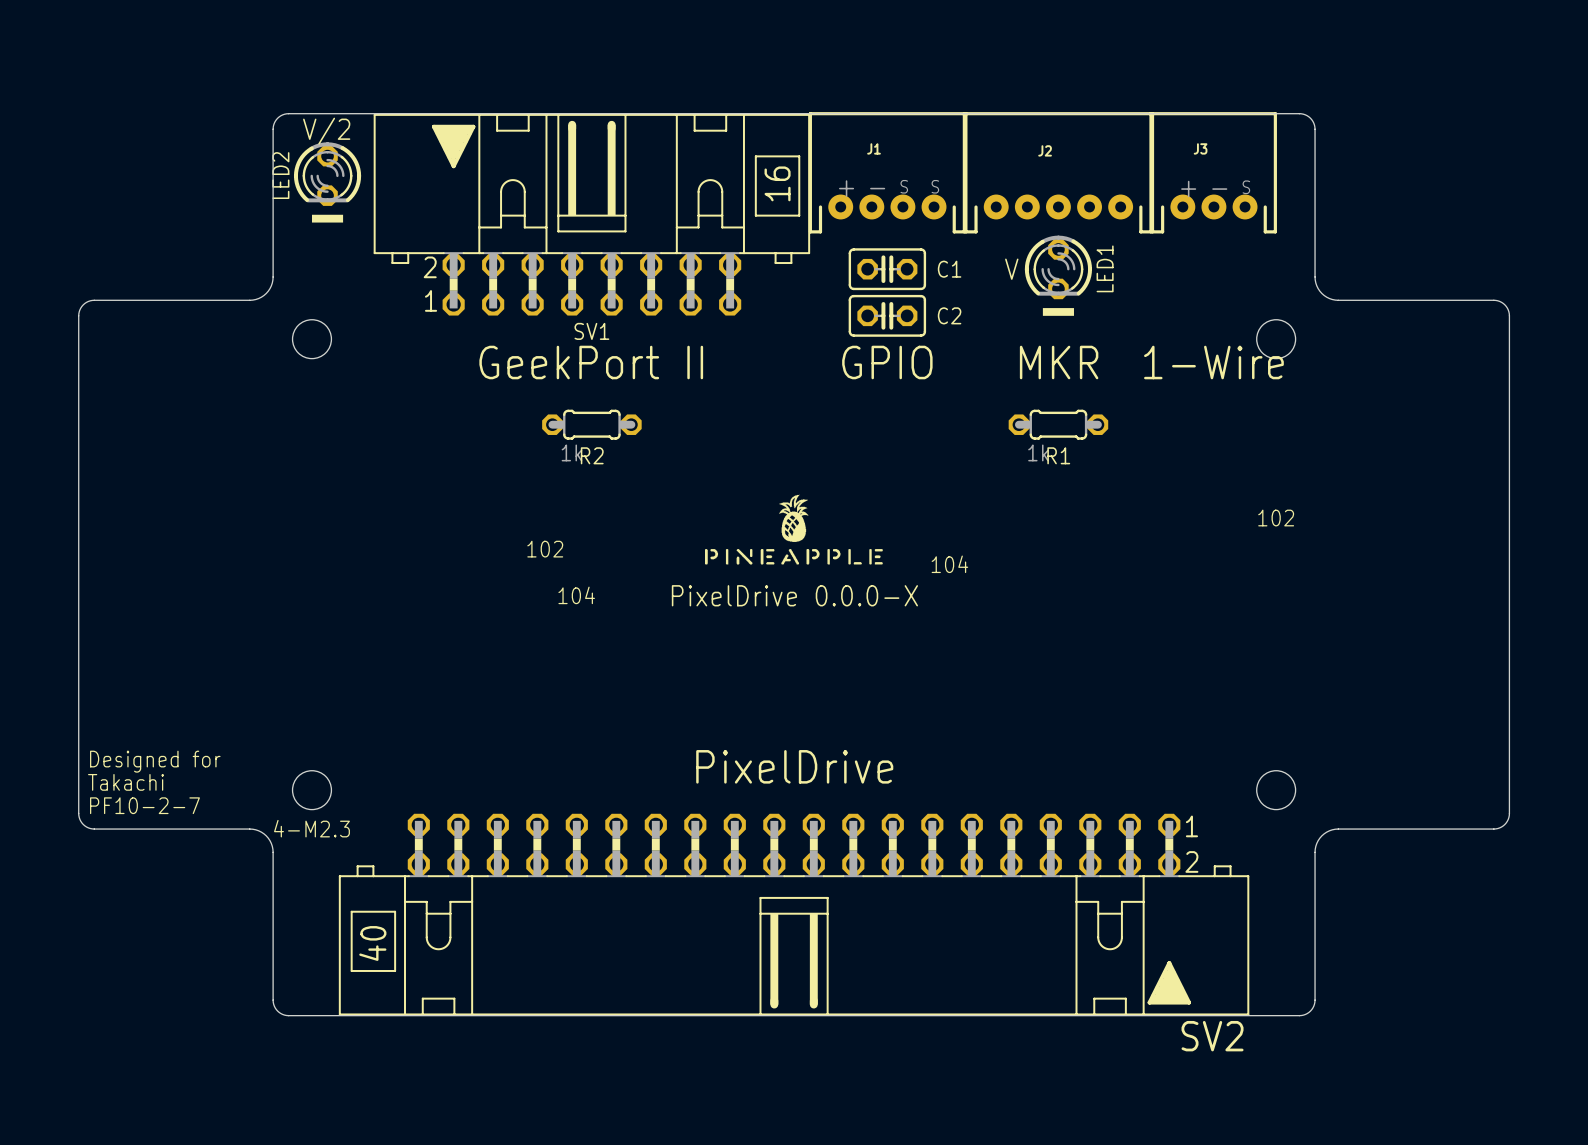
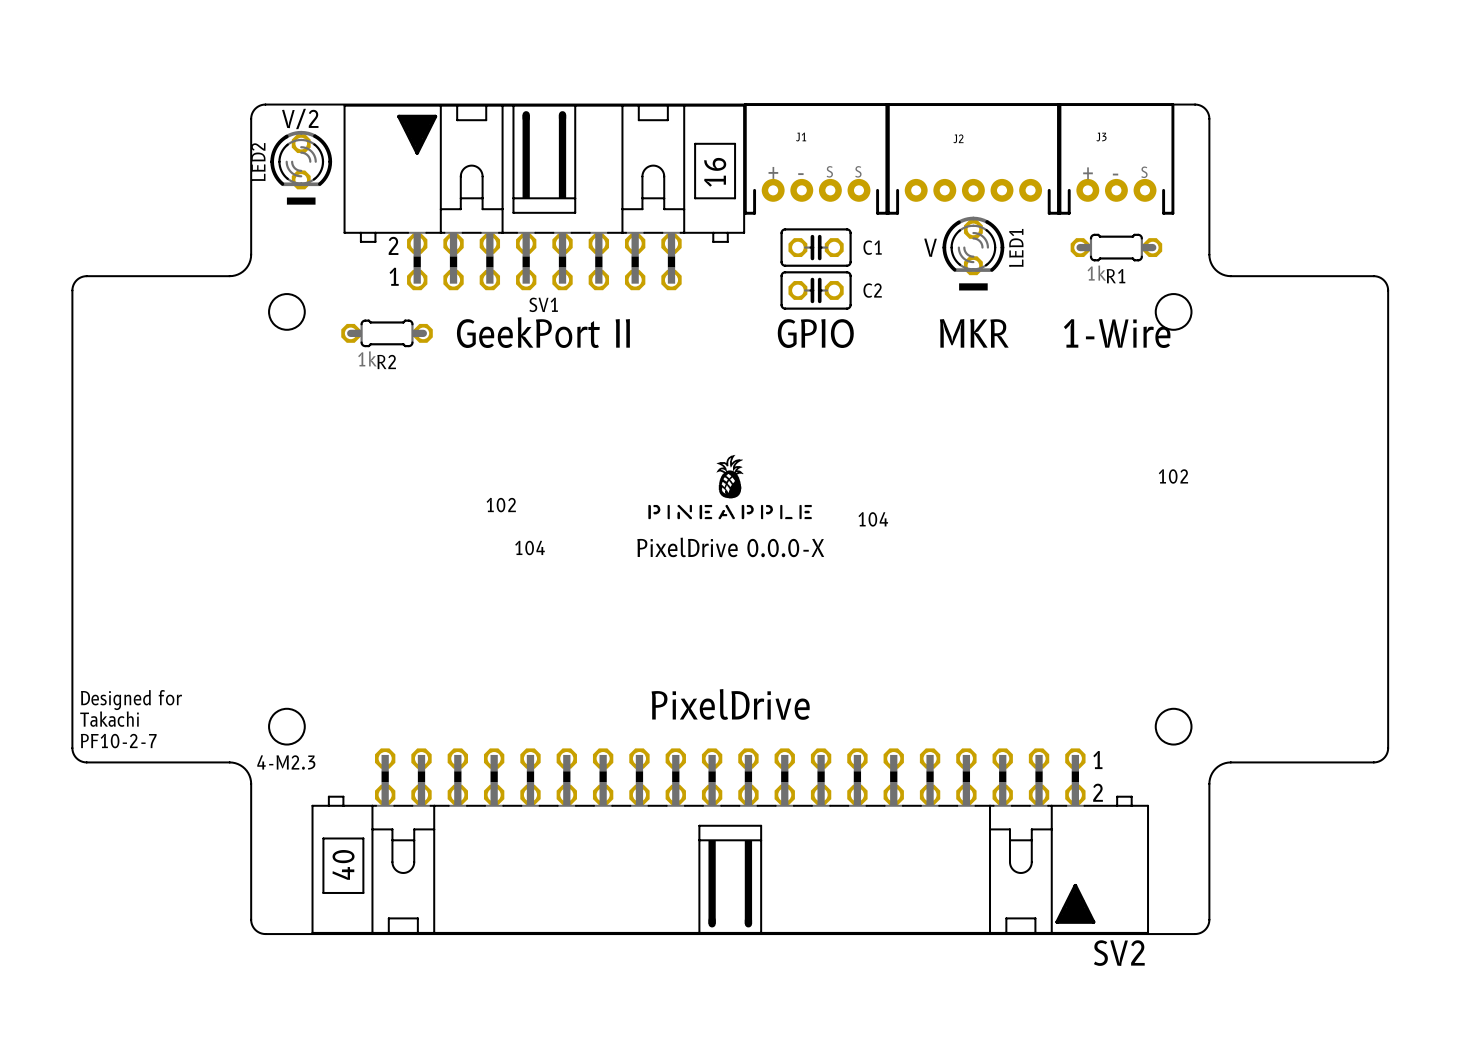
R2 position: (591, 424) -> (387, 333)
R1 position: (1058, 424) -> (1116, 247)

